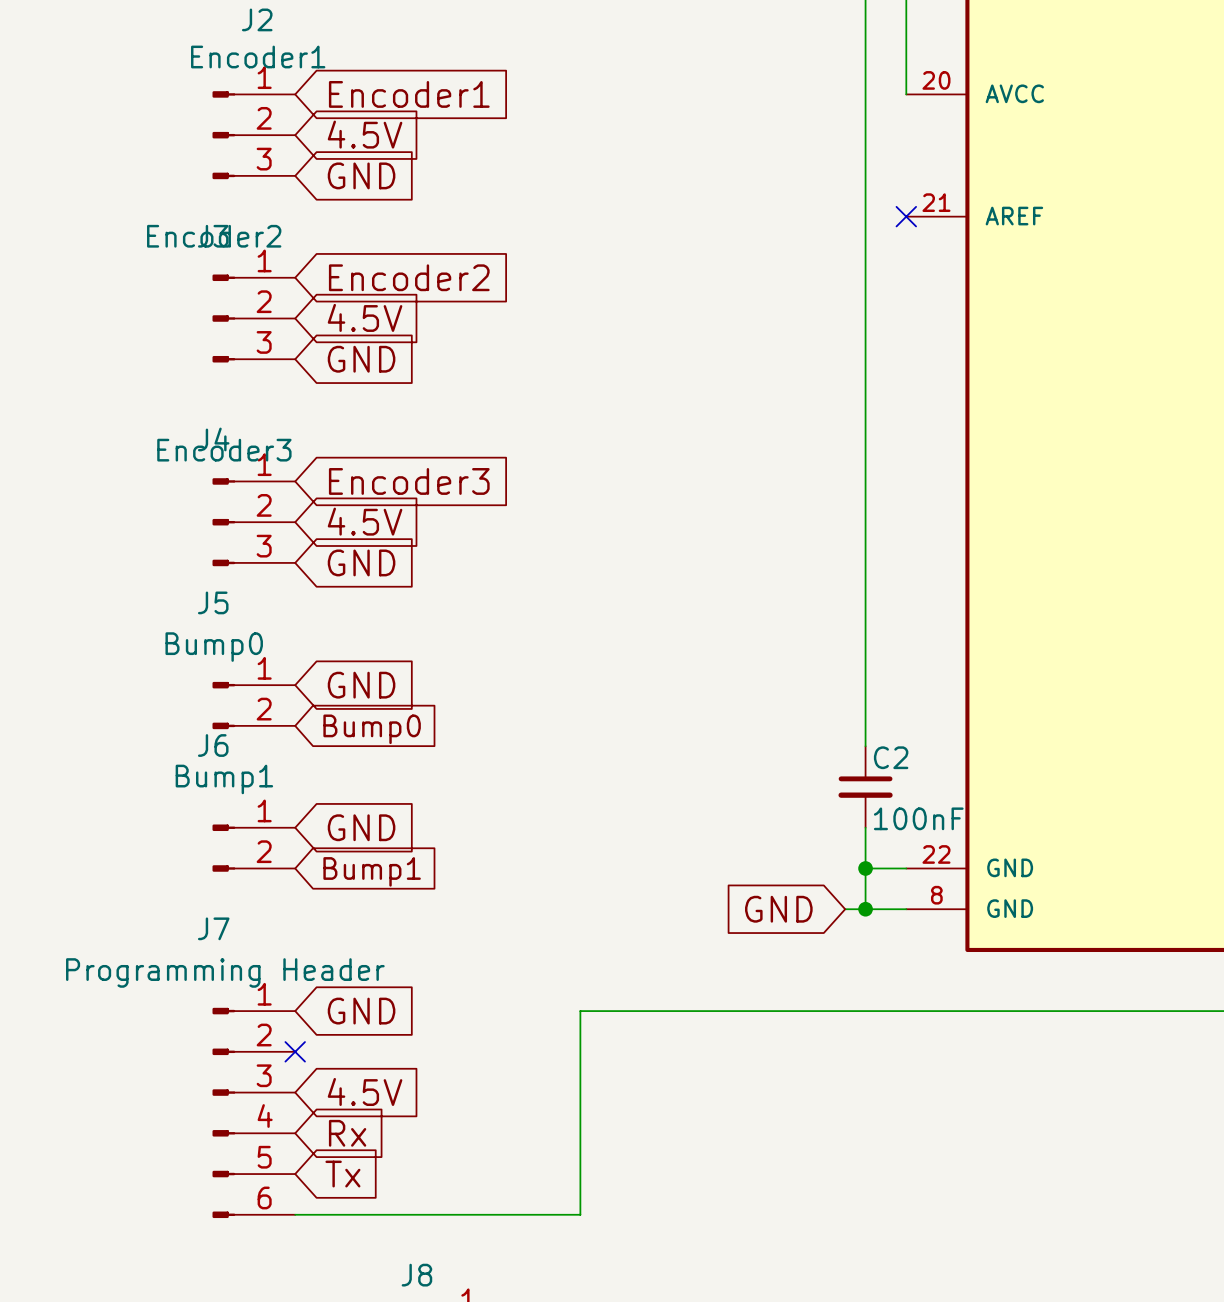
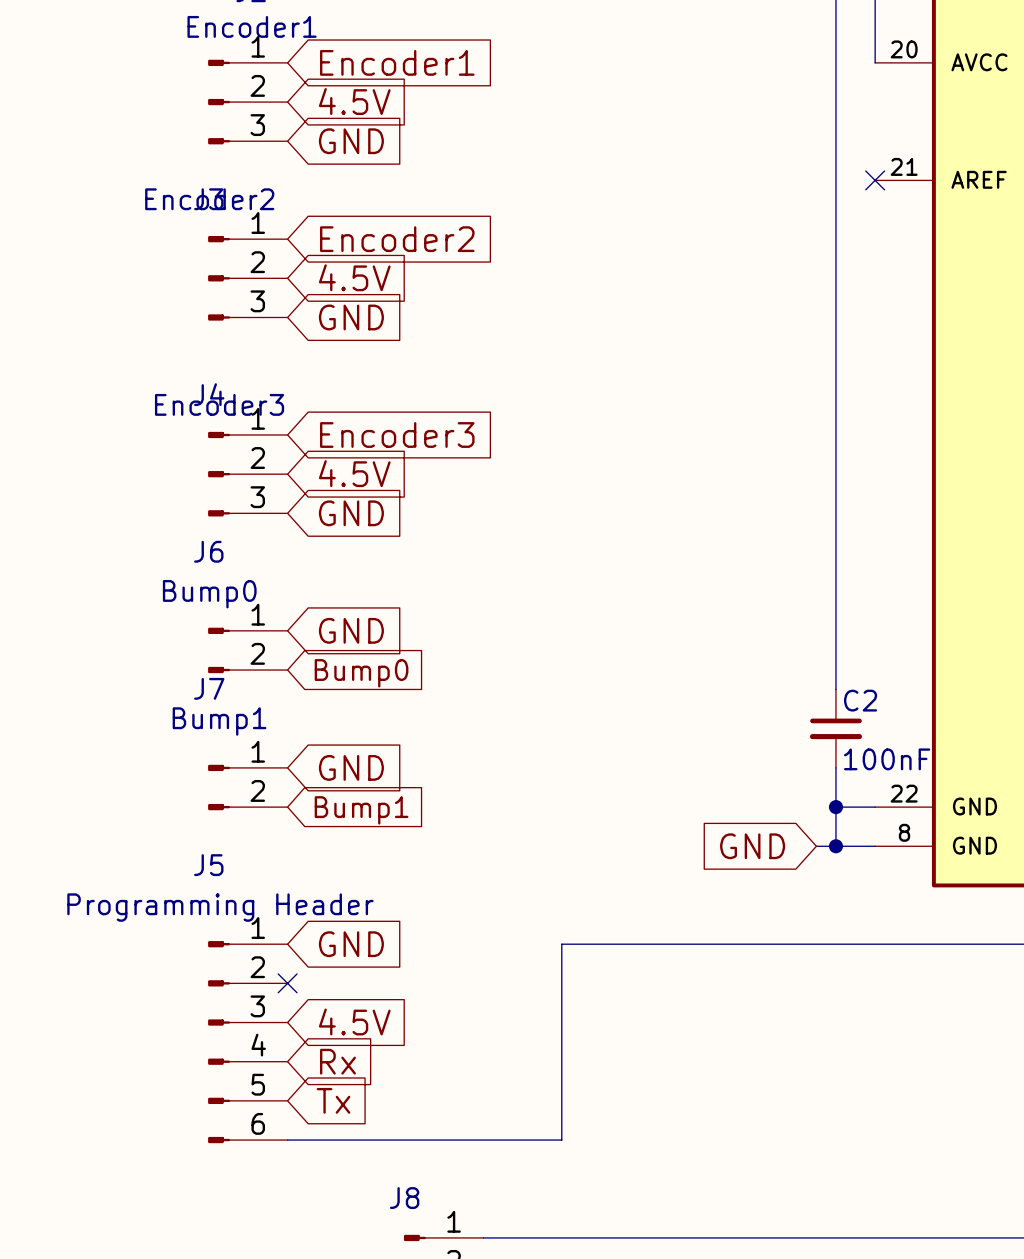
J5 name: J5 (213, 602) -> J6 (208, 551)
J6 name: J6 (213, 745) -> J7 (209, 688)
J7 name: J7 (213, 928) -> J5 (208, 865)

